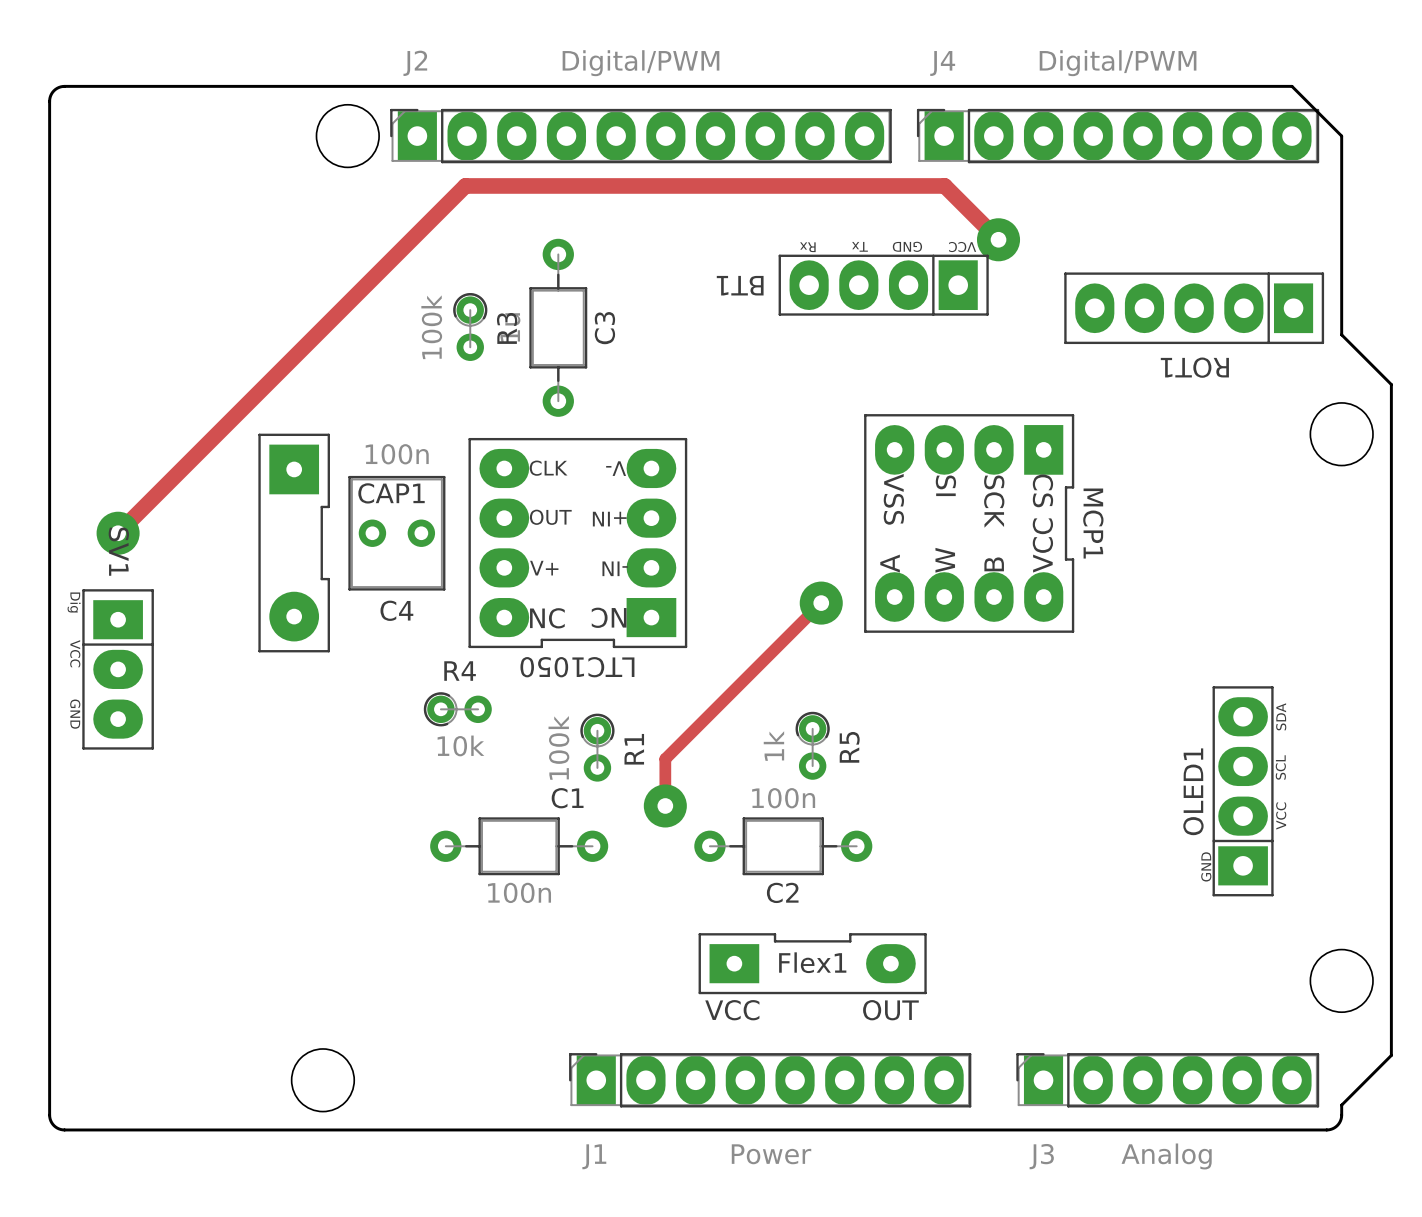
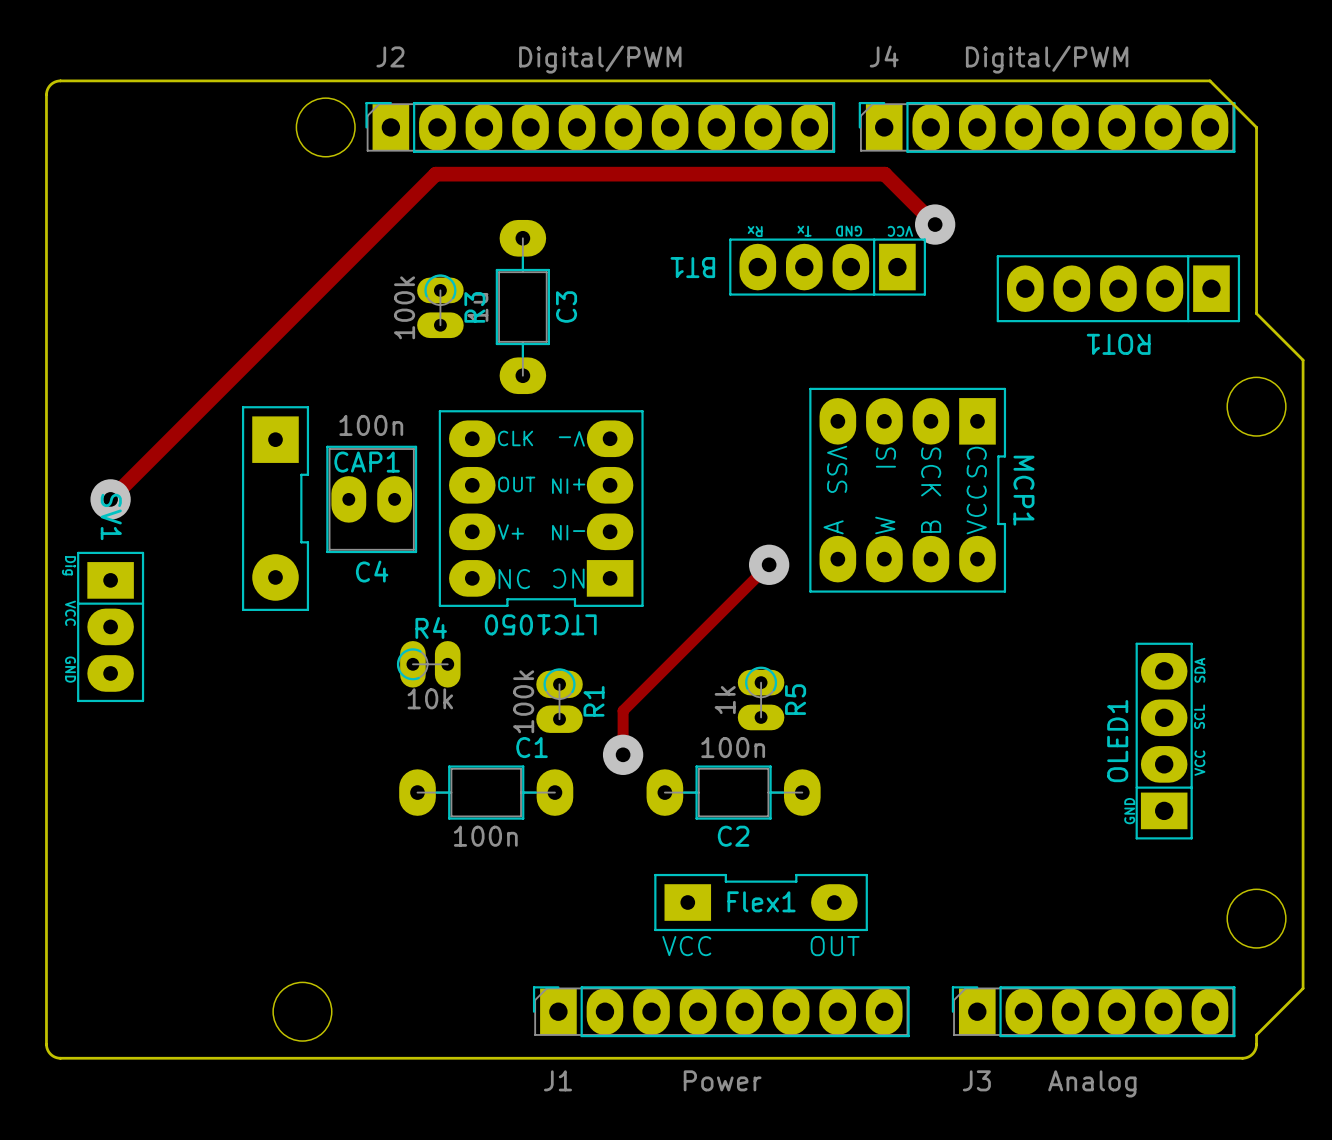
C3 footprint: [529, 238, 588, 417] -> [495, 219, 550, 395]
R3 footprint: [453, 293, 488, 361] -> [417, 274, 464, 339]
C4 footprint: [348, 475, 446, 591] -> [326, 445, 418, 554]
R4 footprint: [423, 692, 492, 727] -> [396, 641, 461, 688]
R5 footprint: [795, 711, 830, 780] -> [737, 666, 785, 731]
R1 footprint: [580, 713, 615, 782] -> [536, 668, 583, 733]
C1 footprint: [430, 817, 609, 876] -> [399, 765, 574, 820]
C2 footprint: [694, 817, 873, 876] -> [646, 765, 821, 820]

